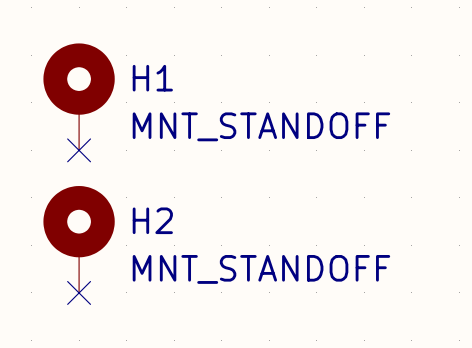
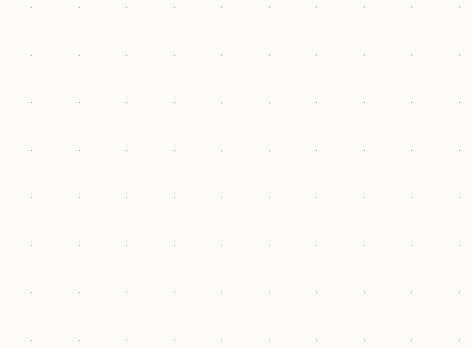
H1: MNT_STANDOFF (79, 96) -> none
no-connect mark: (79, 150) -> none
H2: MNT_STANDOFF (79, 239) -> none
no-connect mark: (79, 292) -> none

